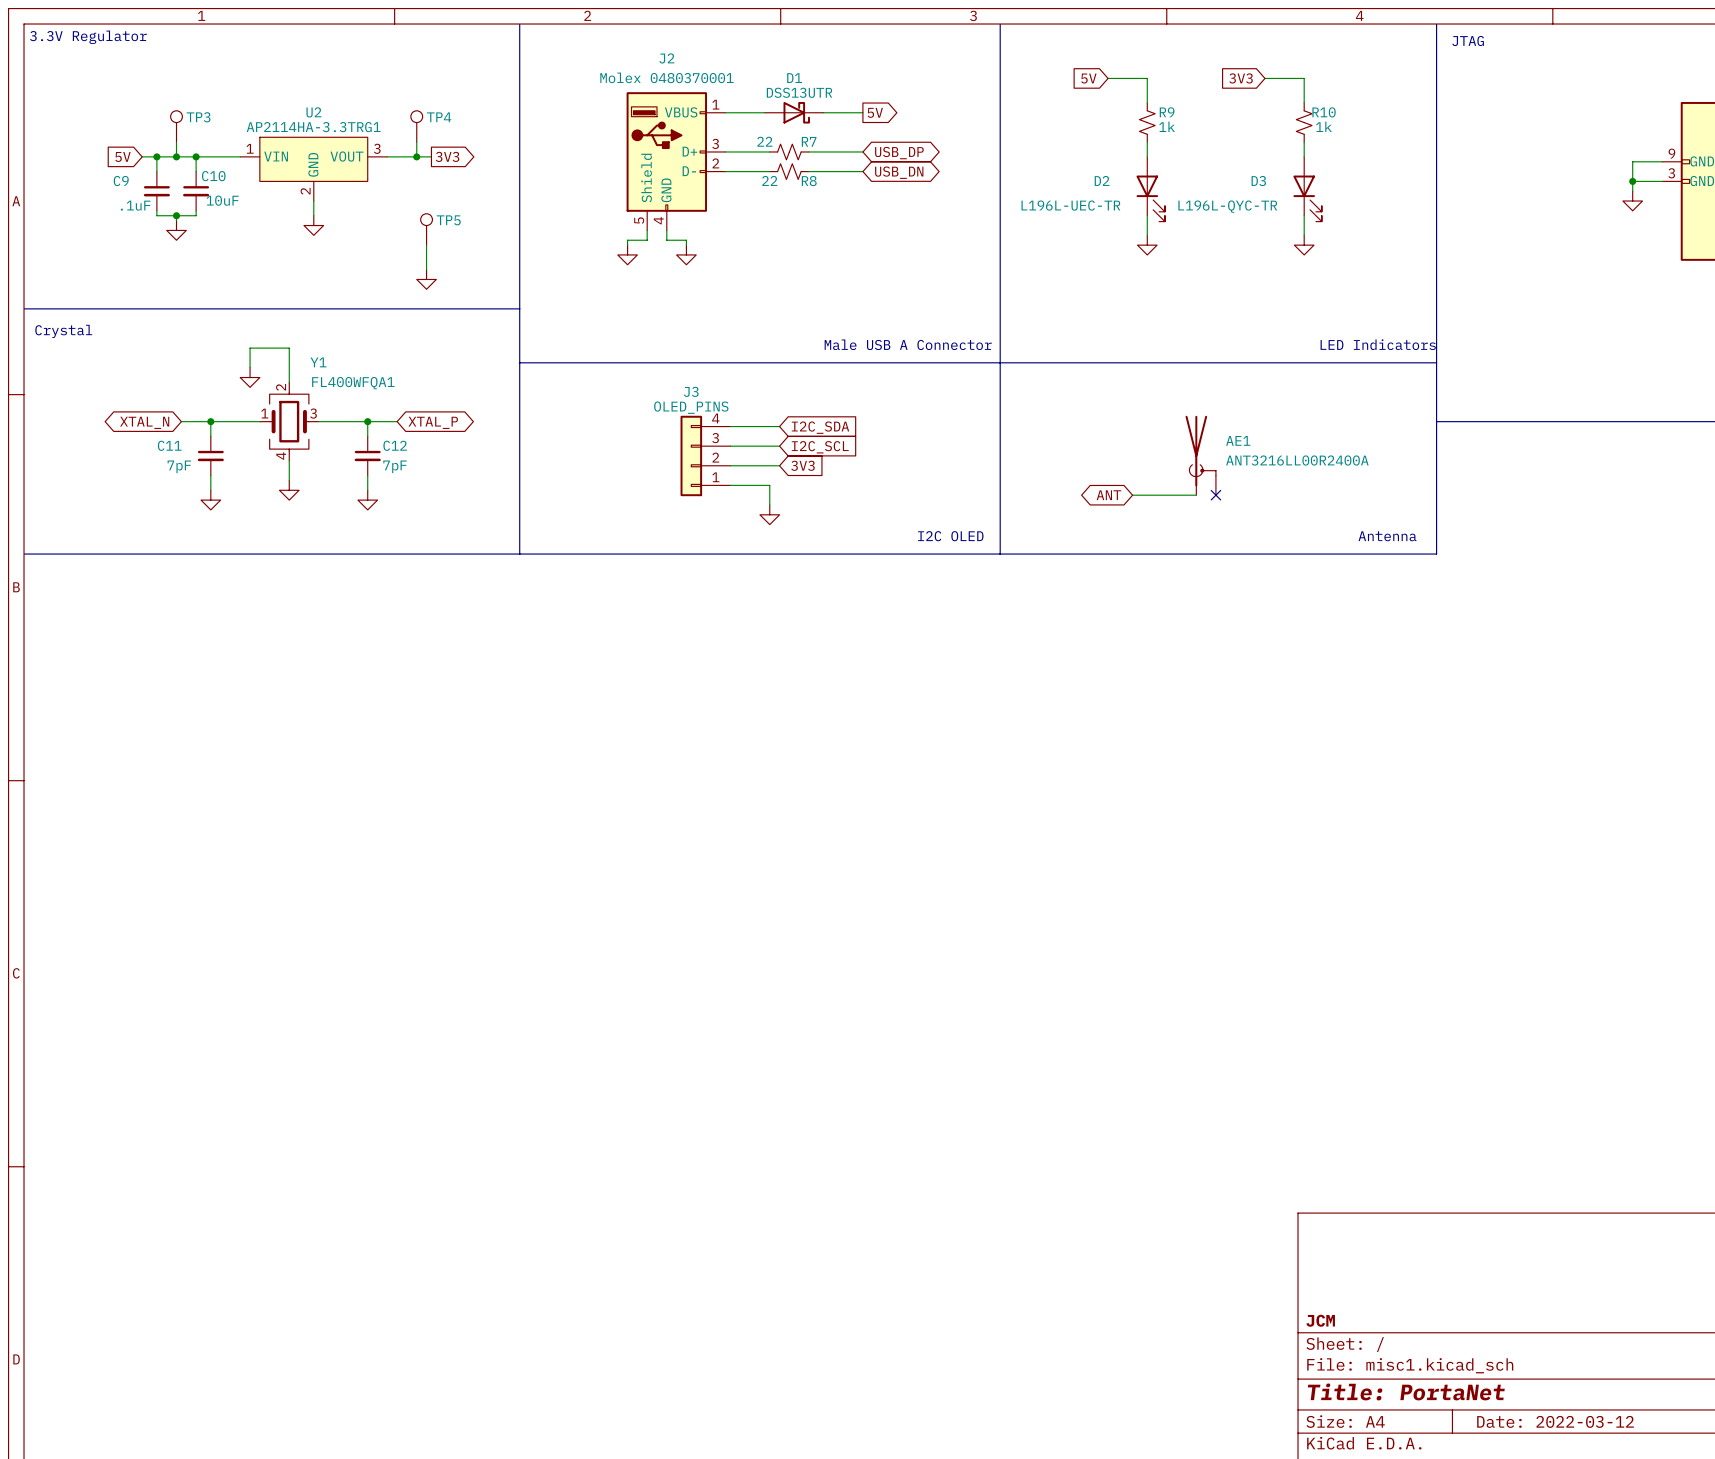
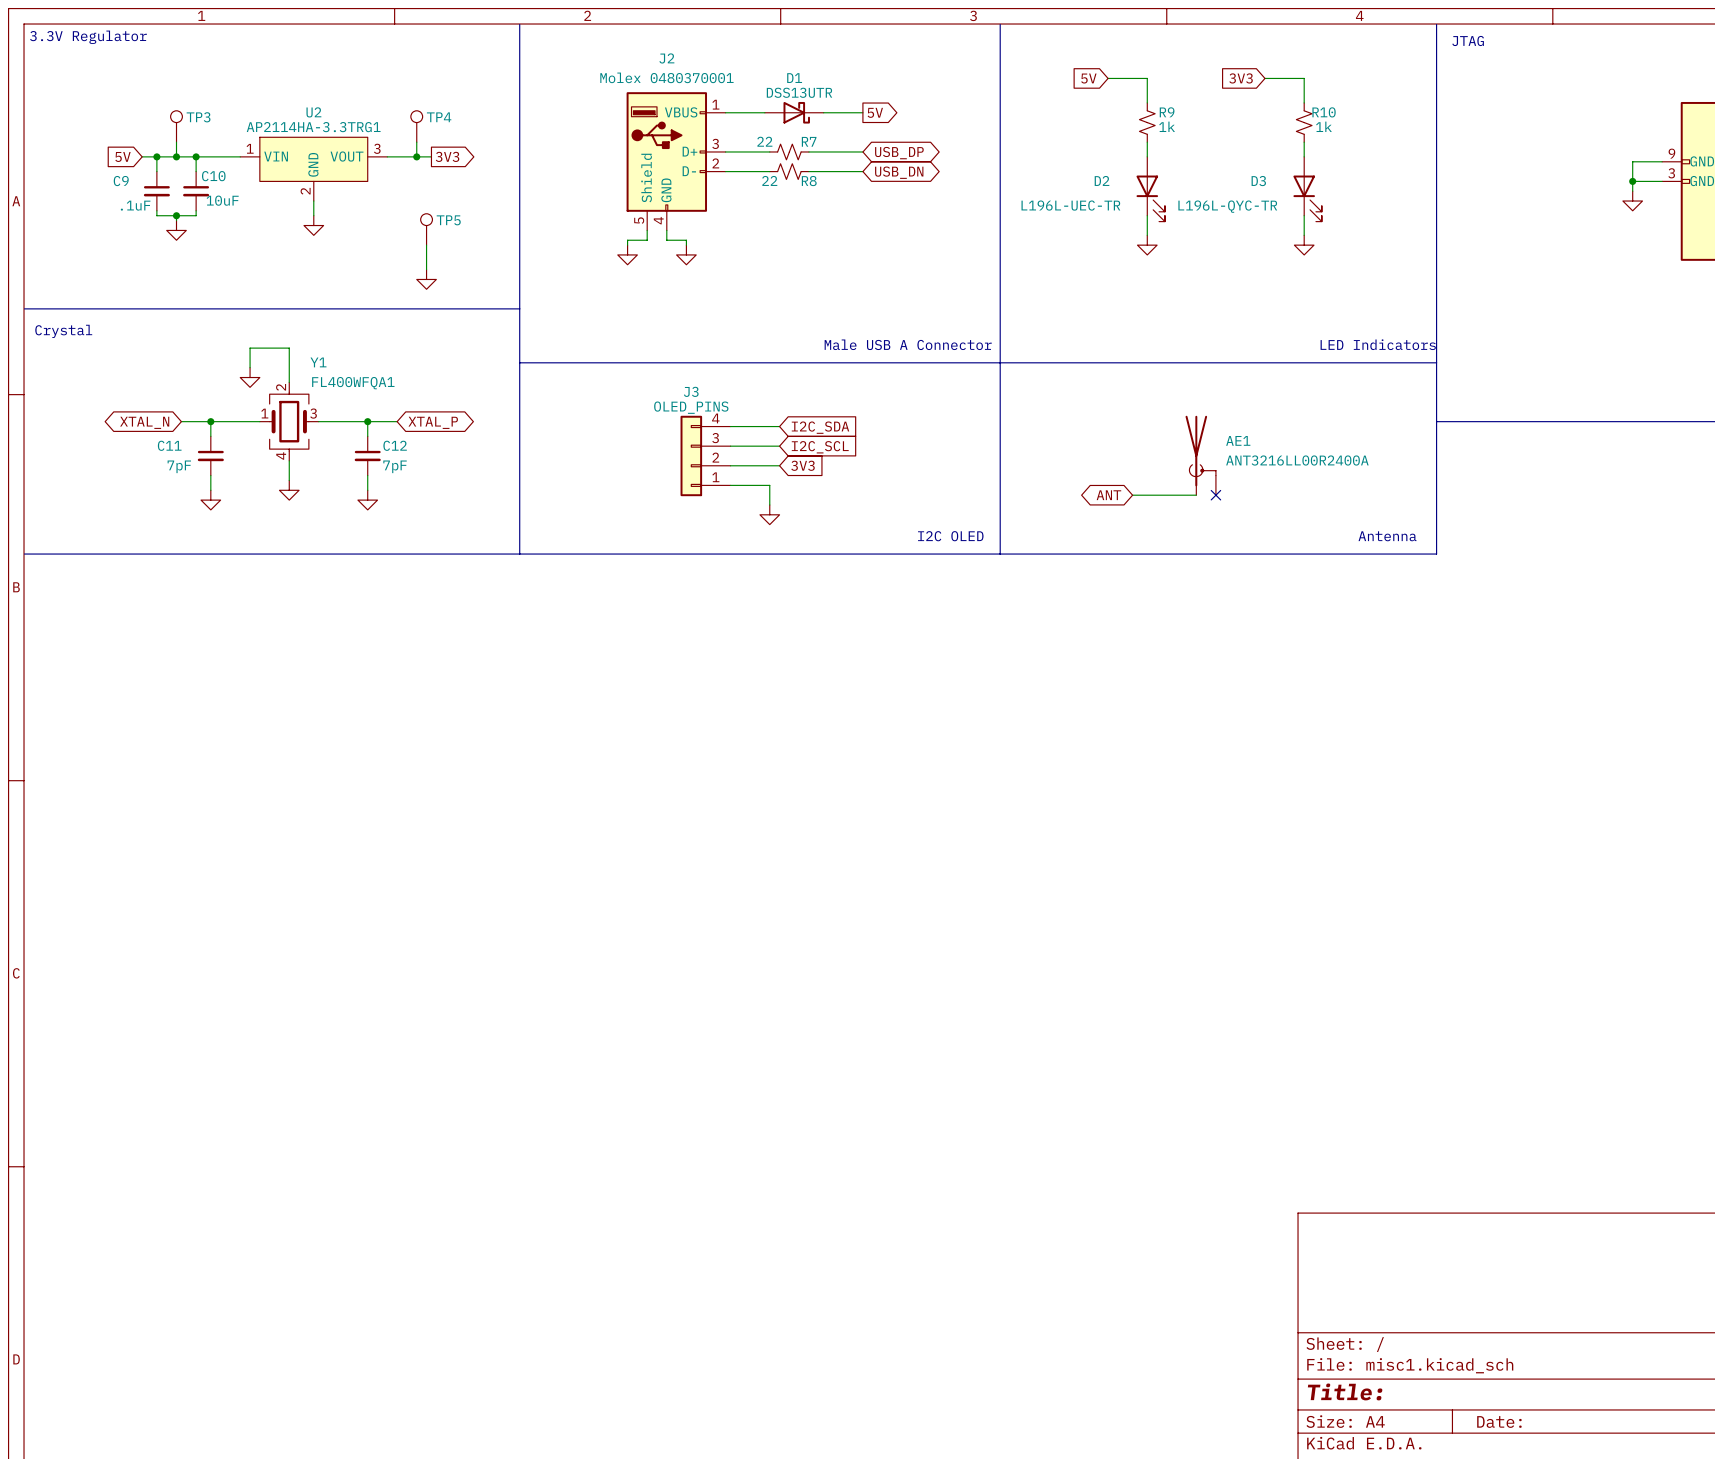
title block: JCM (1320, 1320) -> none
title block: Title: PortaNet (1406, 1391) -> Title: (1345, 1391)
title block: Date: 2022-03-12 (1555, 1421) -> Date: (1499, 1421)

